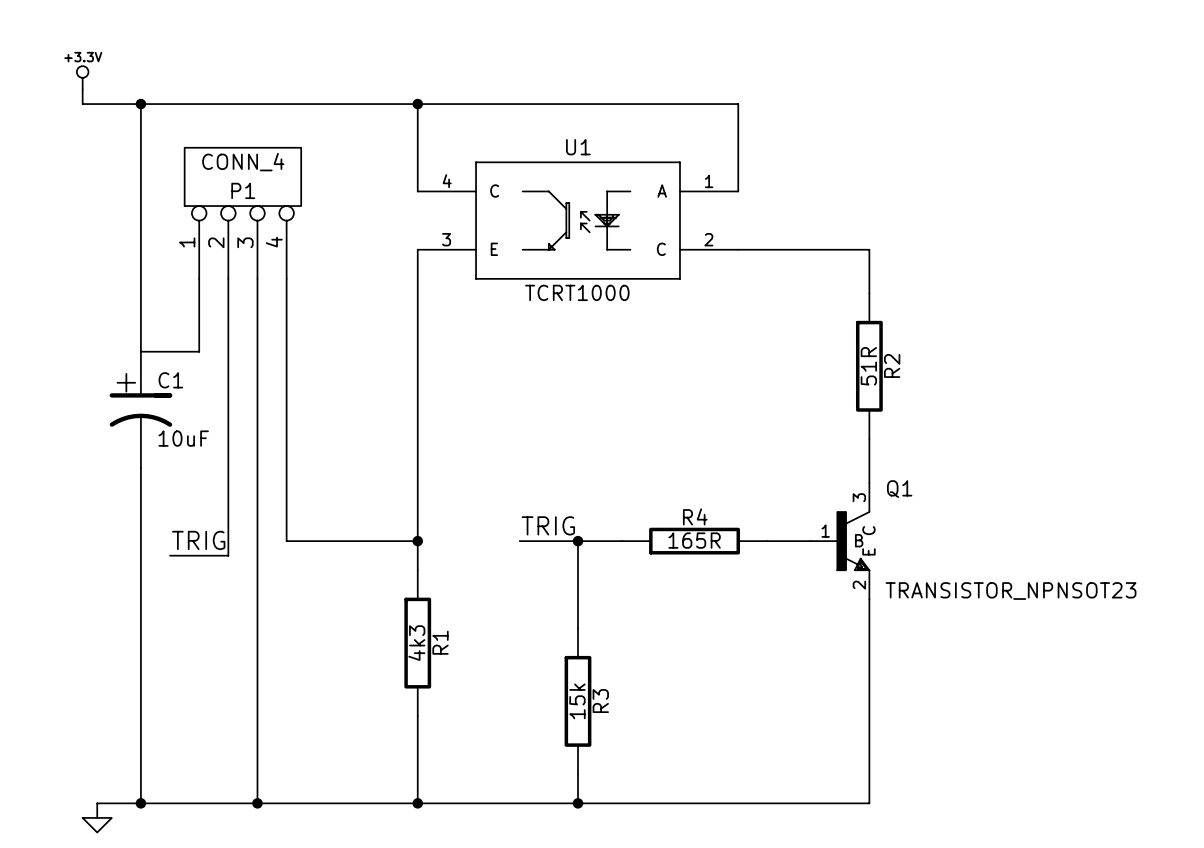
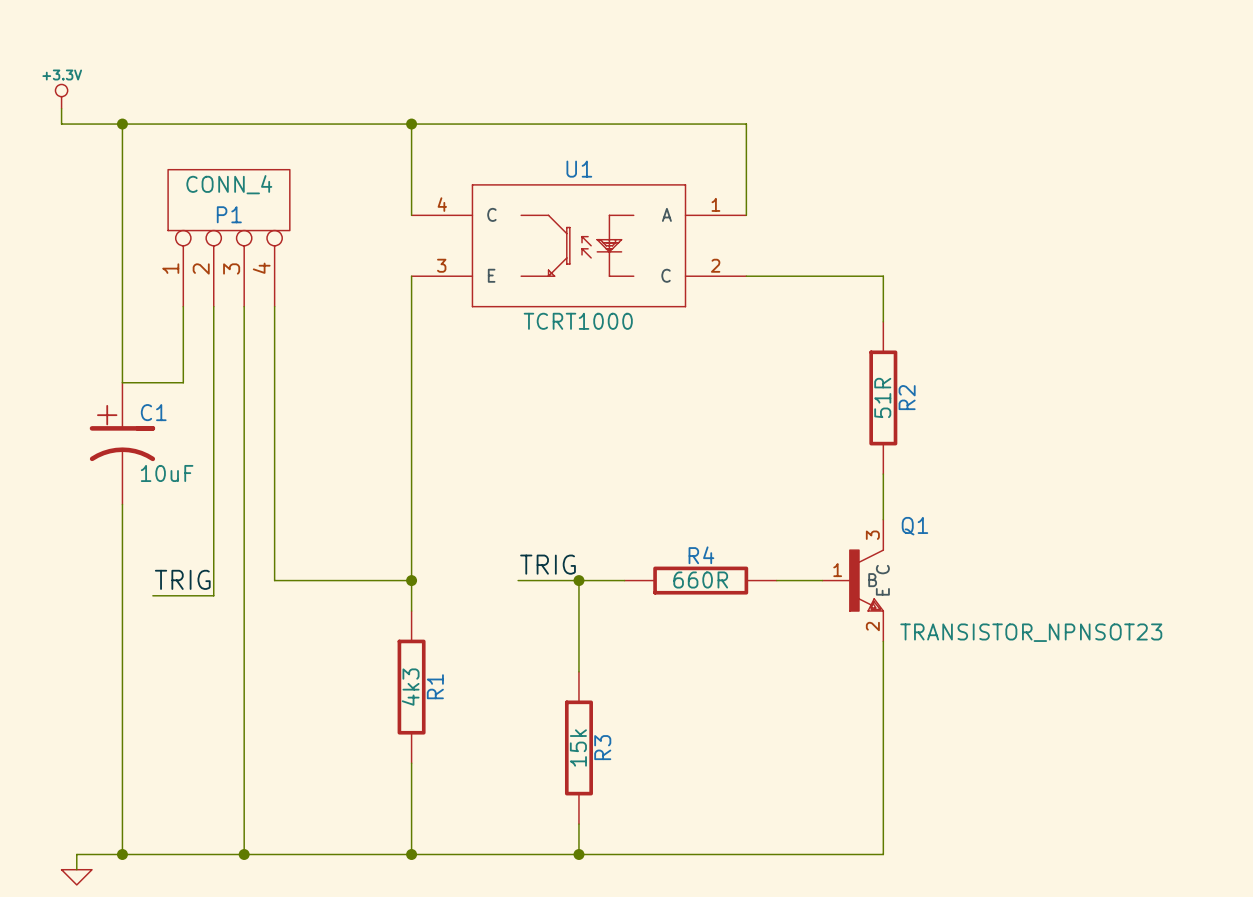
R4 value: 165R (694, 540) -> 660R (700, 580)

